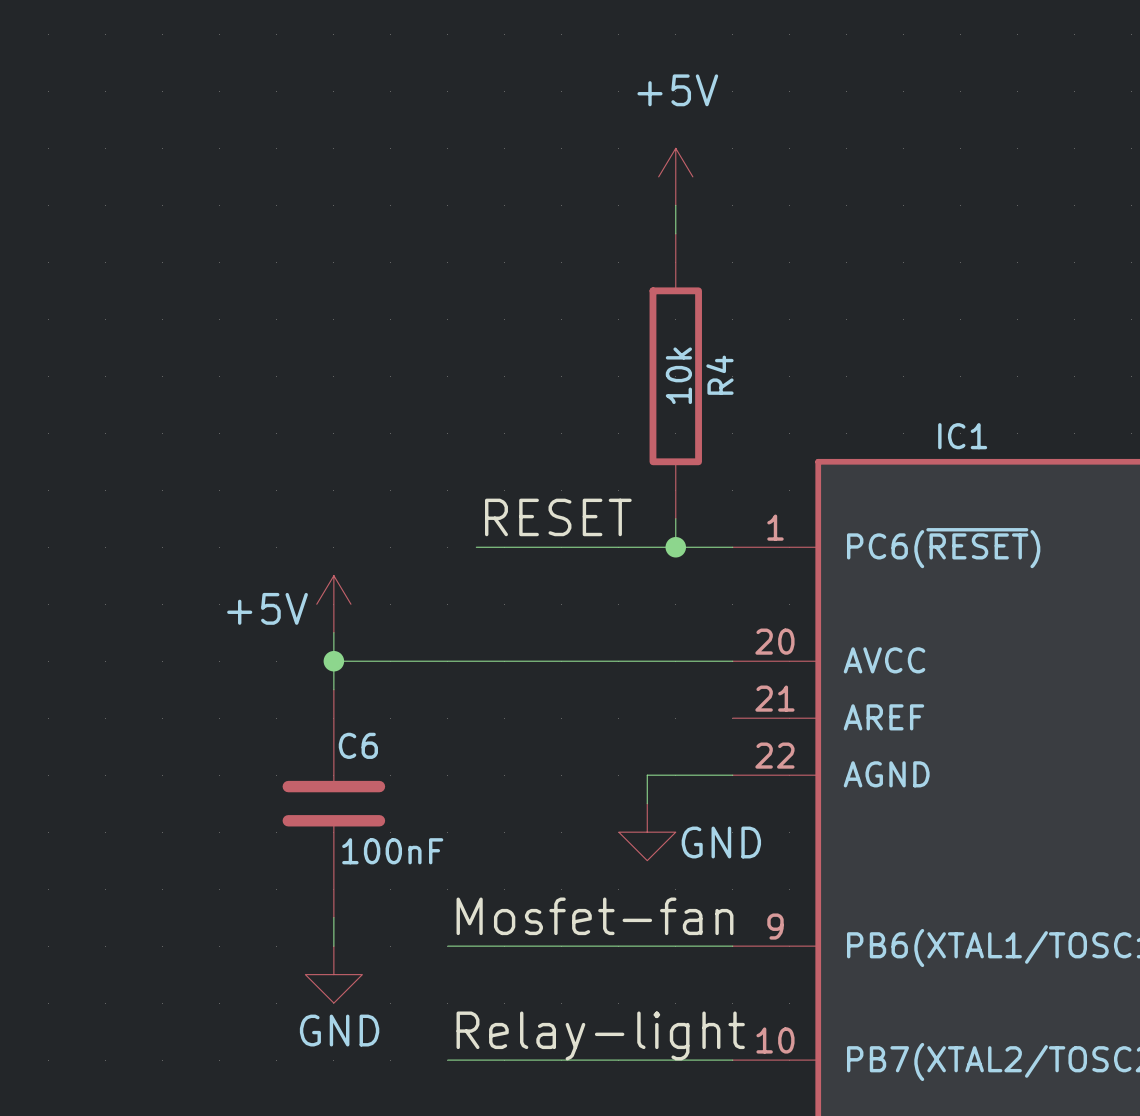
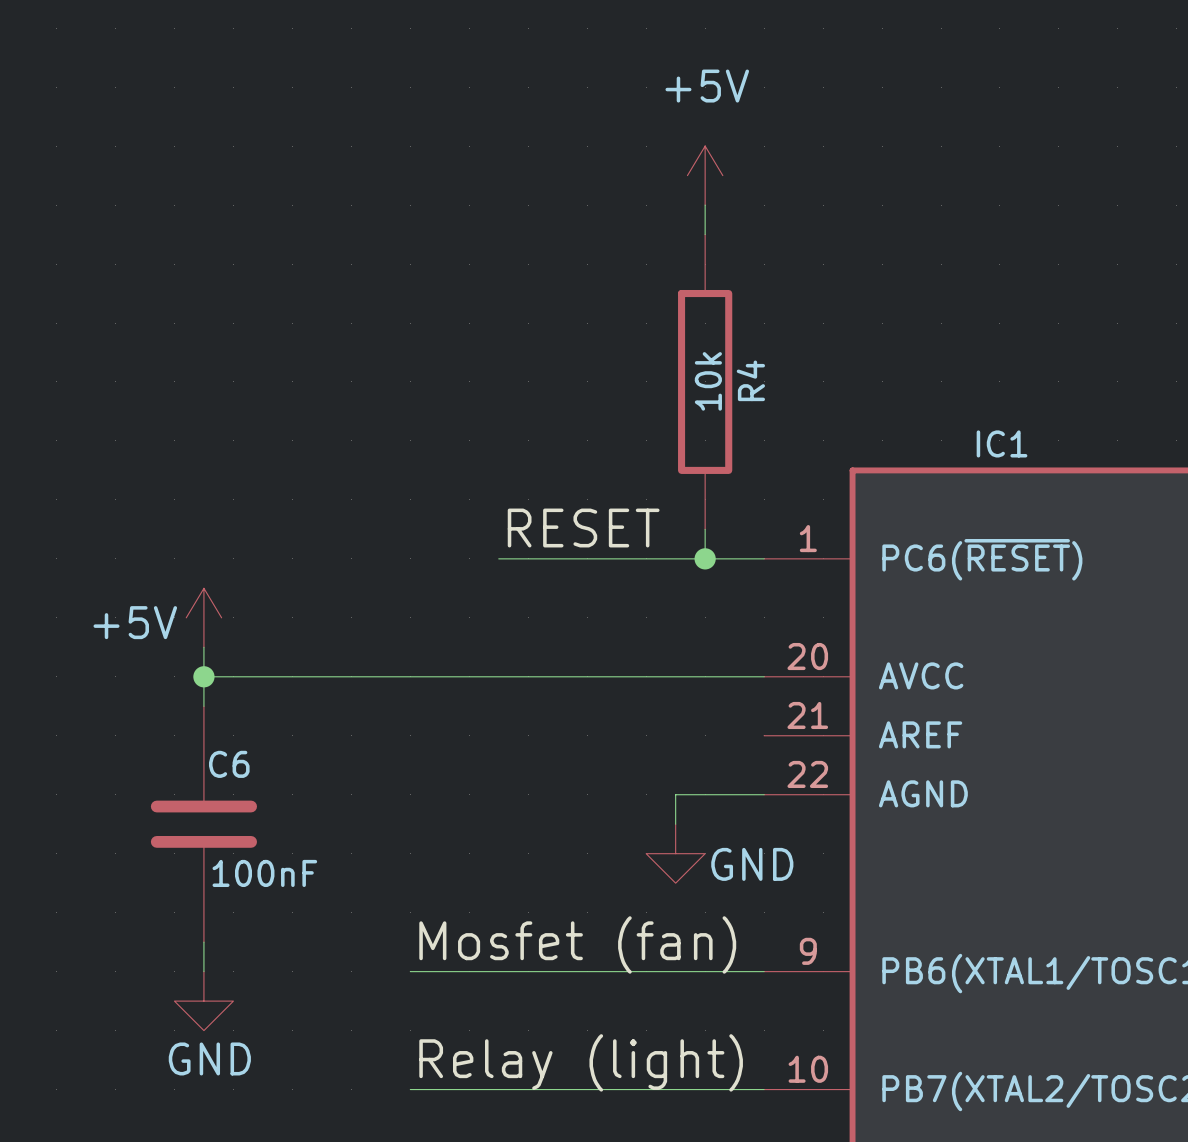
power symbol position: +5V (333, 604) -> +5V (203, 617)
wire: (333, 632) (333, 689) -> (203, 647) (203, 706)
wire: none -> (203, 676) (351, 676)
junction: none -> (203, 676)
junction: (333, 661) -> none
C6 position: (333, 803) -> (203, 824)
label: Mosfet-fan (594, 916) -> Mosfet (fan) (577, 944)
wire: (333, 917) (333, 946) -> (203, 942) (203, 971)
wire: none -> (410, 971) (469, 971)
power symbol position: GND (333, 974) -> GND (203, 1001)
label: Relay-light (600, 1035) -> Relay (light) (581, 1062)
wire: none -> (410, 1089) (469, 1089)

